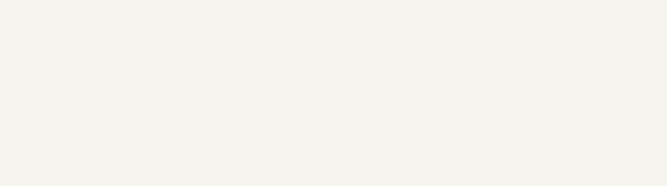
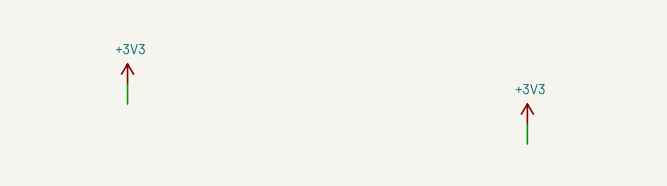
power symbol: none -> +3V3 (127, 74)
wire: none -> (127, 84) (127, 104)
power symbol: none -> +3V3 (527, 114)
wire: none -> (527, 124) (527, 144)

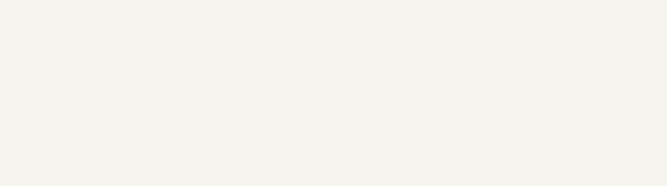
power symbol: +3V3 (127, 74) -> none
wire: (127, 84) (127, 104) -> none
power symbol: +3V3 (527, 114) -> none
wire: (527, 124) (527, 144) -> none

